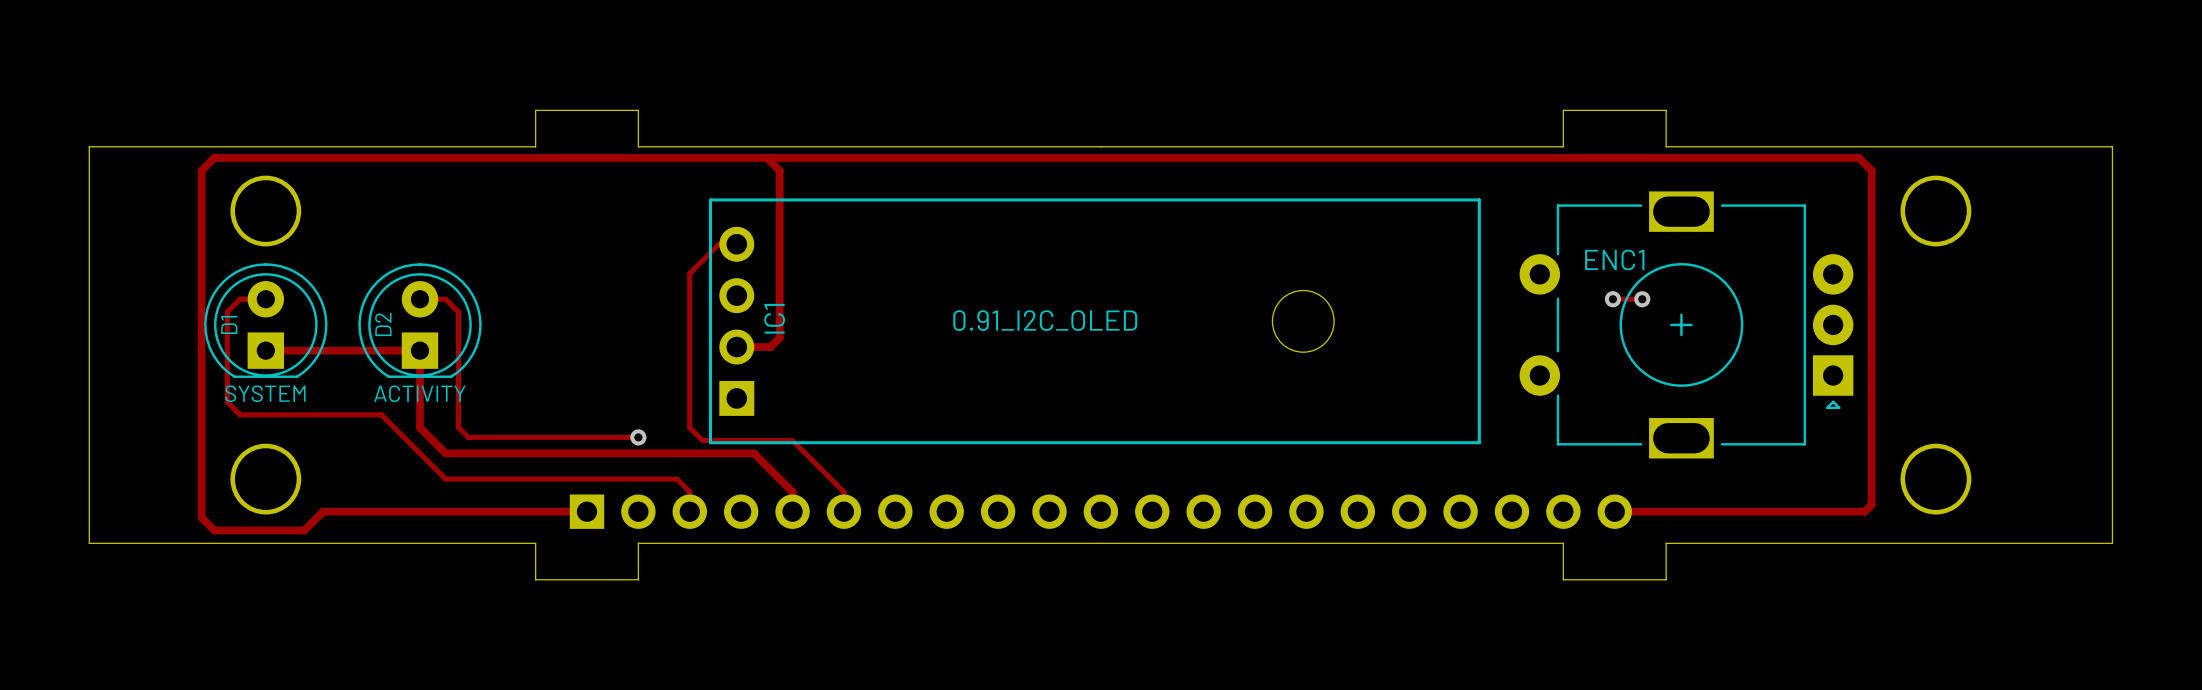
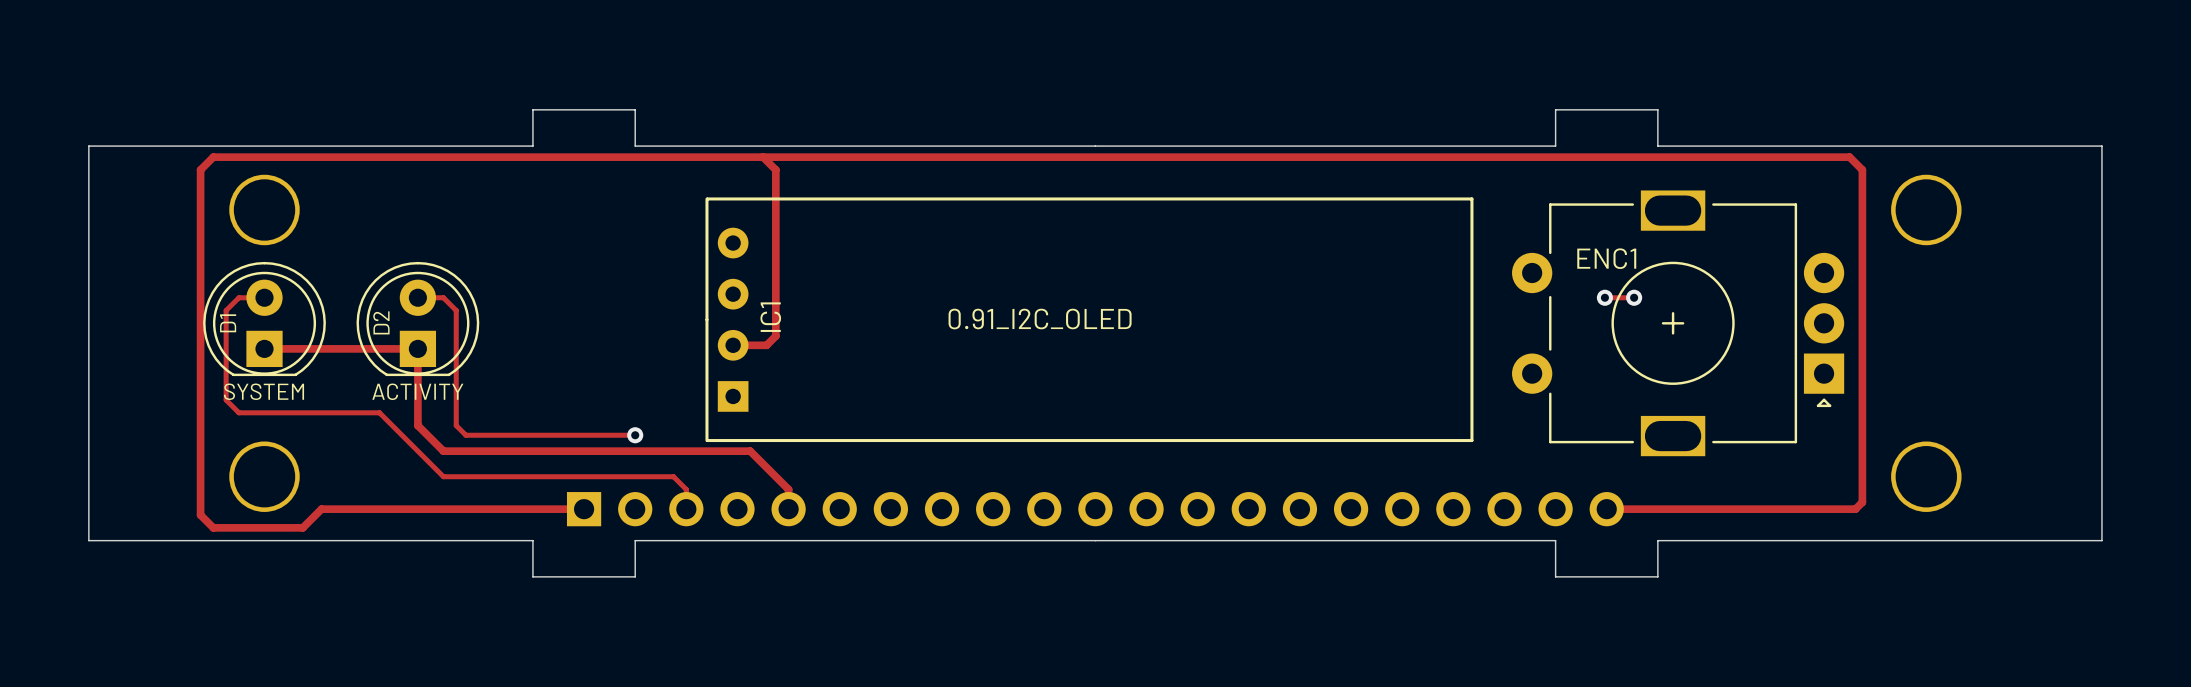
IC1 footprint: [708, 198, 1481, 445] -> [705, 197, 1474, 443]
track: (736, 244) (719, 244) (689, 273) (689, 427) (702, 440) (792, 440) (843, 491) (843, 511) -> none

